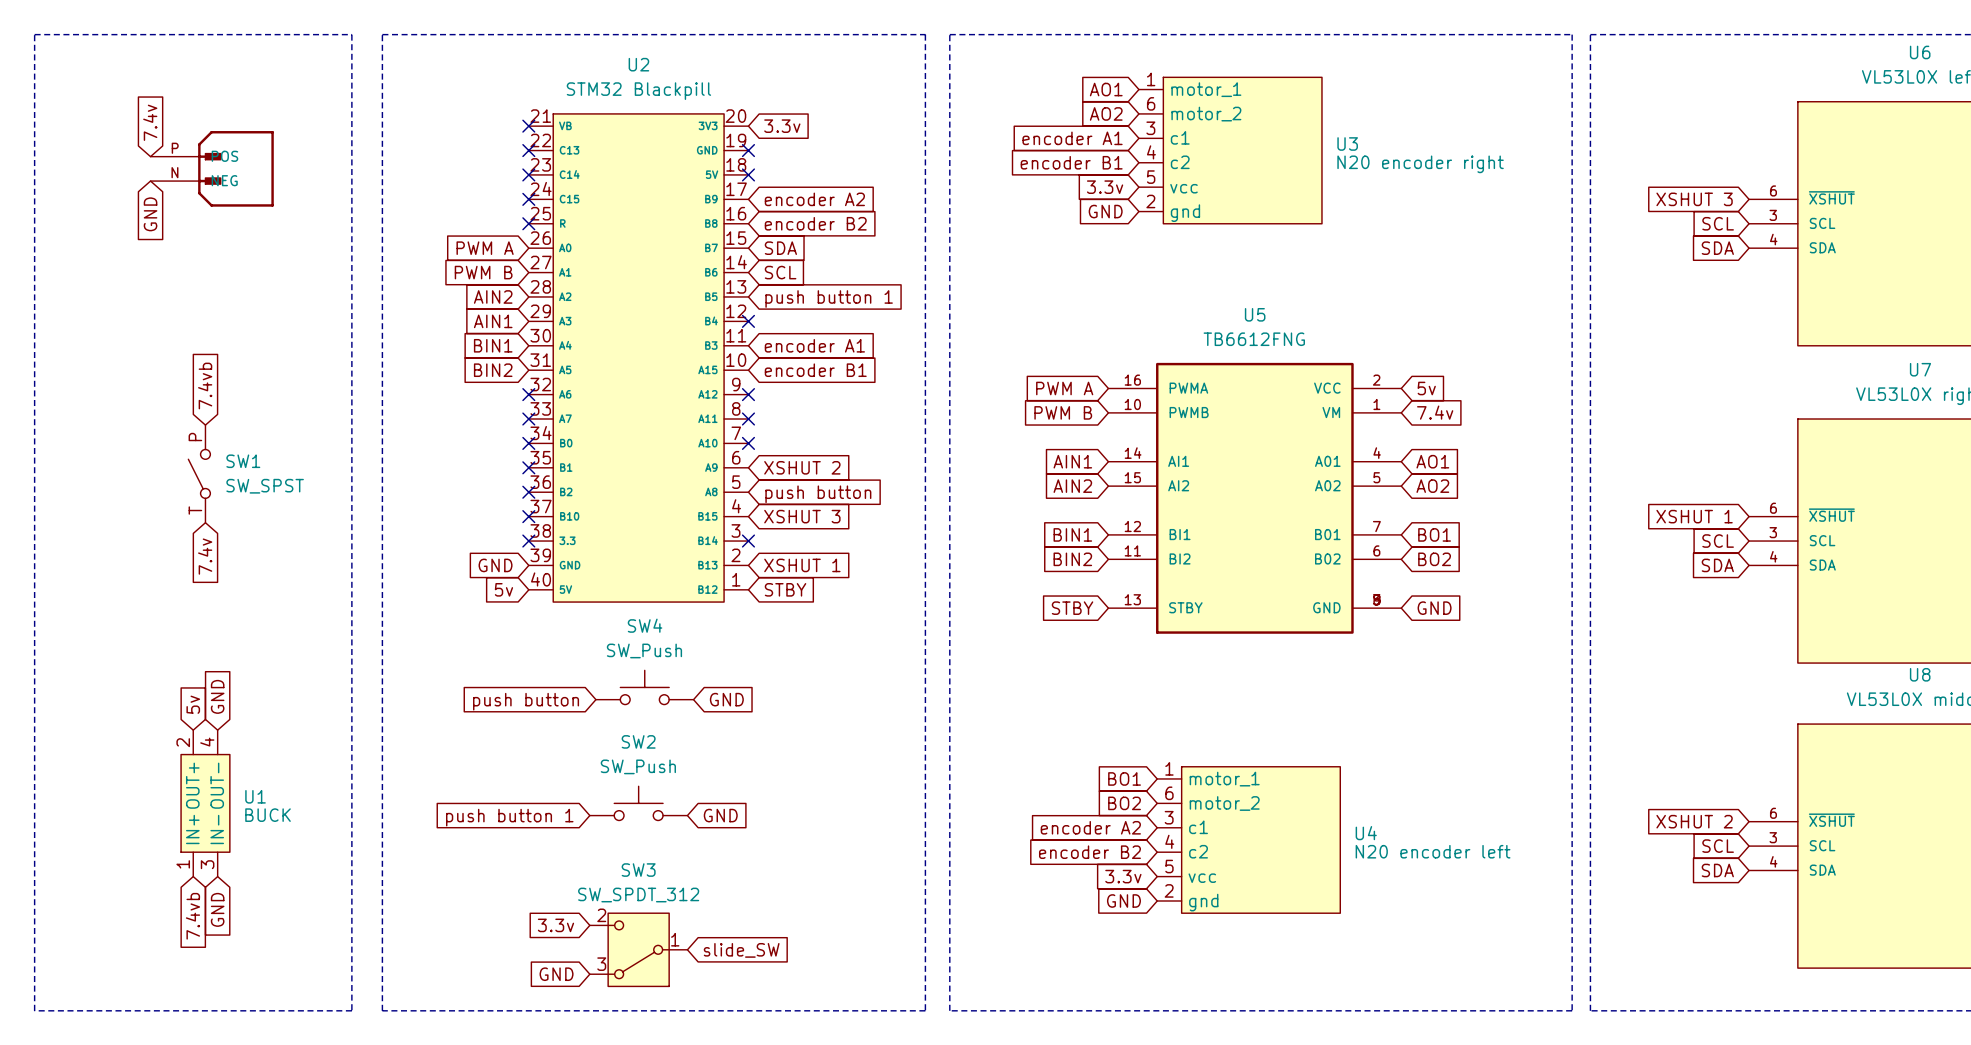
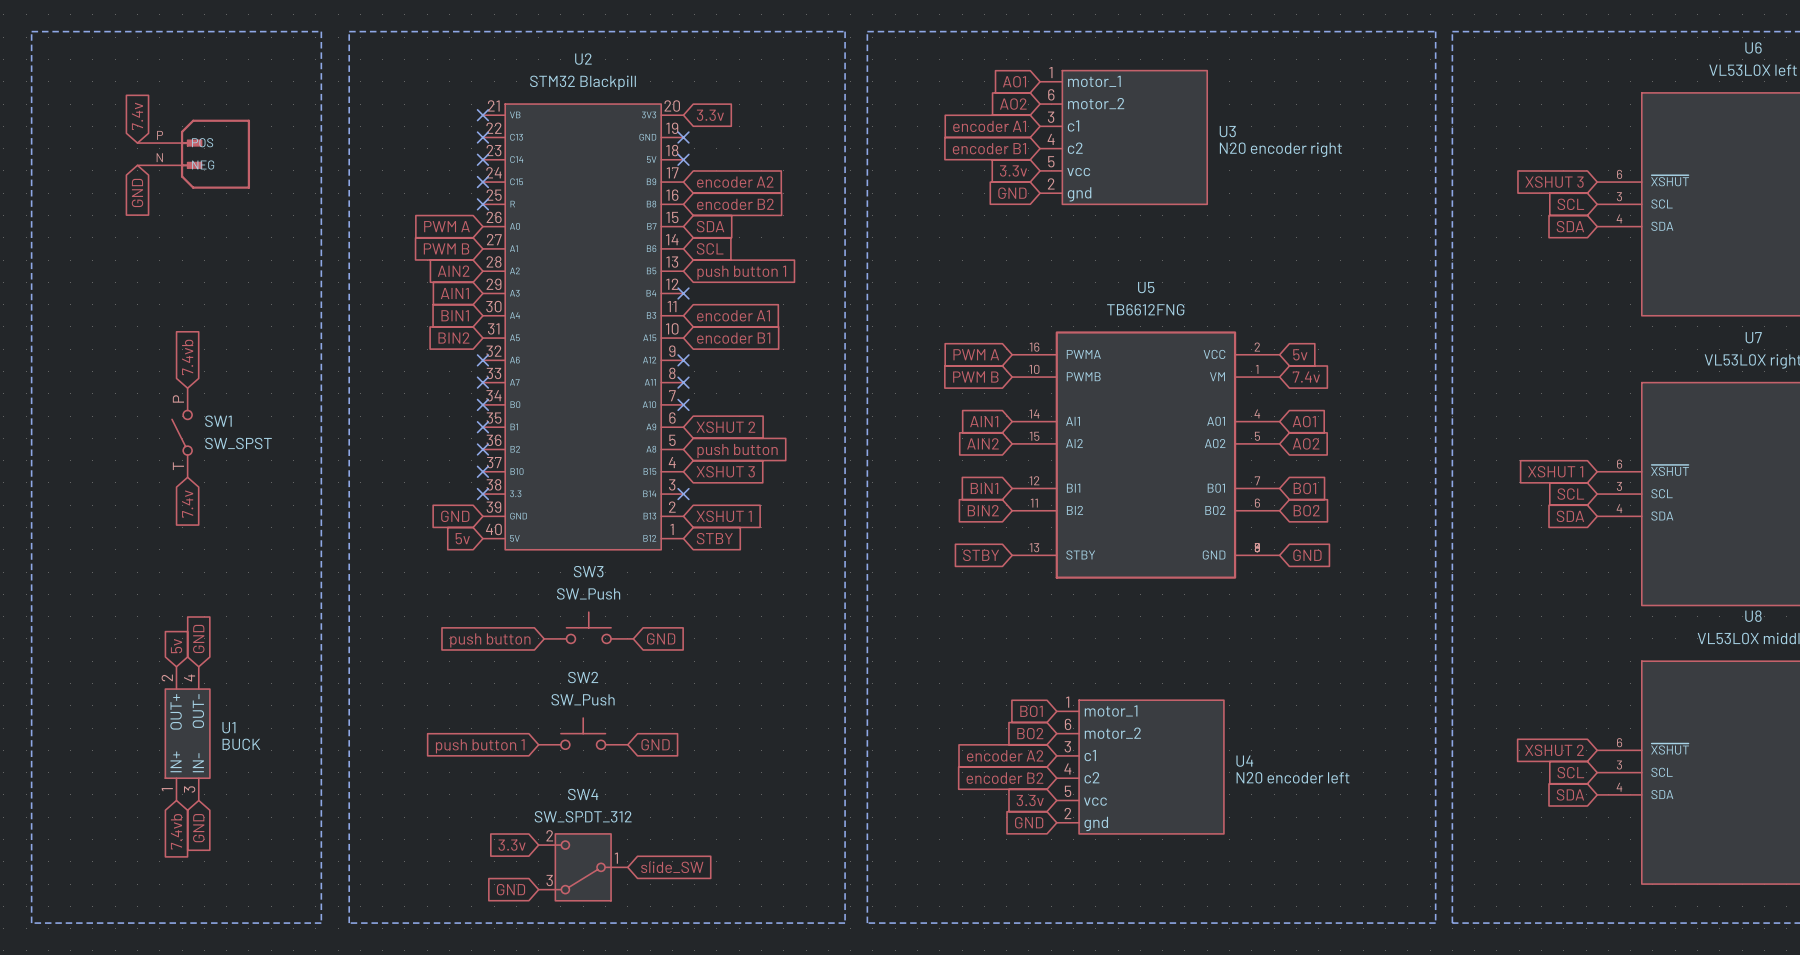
SW4 name: SW4 (645, 625) -> SW3 (588, 571)
SW3 name: SW3 (638, 870) -> SW4 (583, 794)

